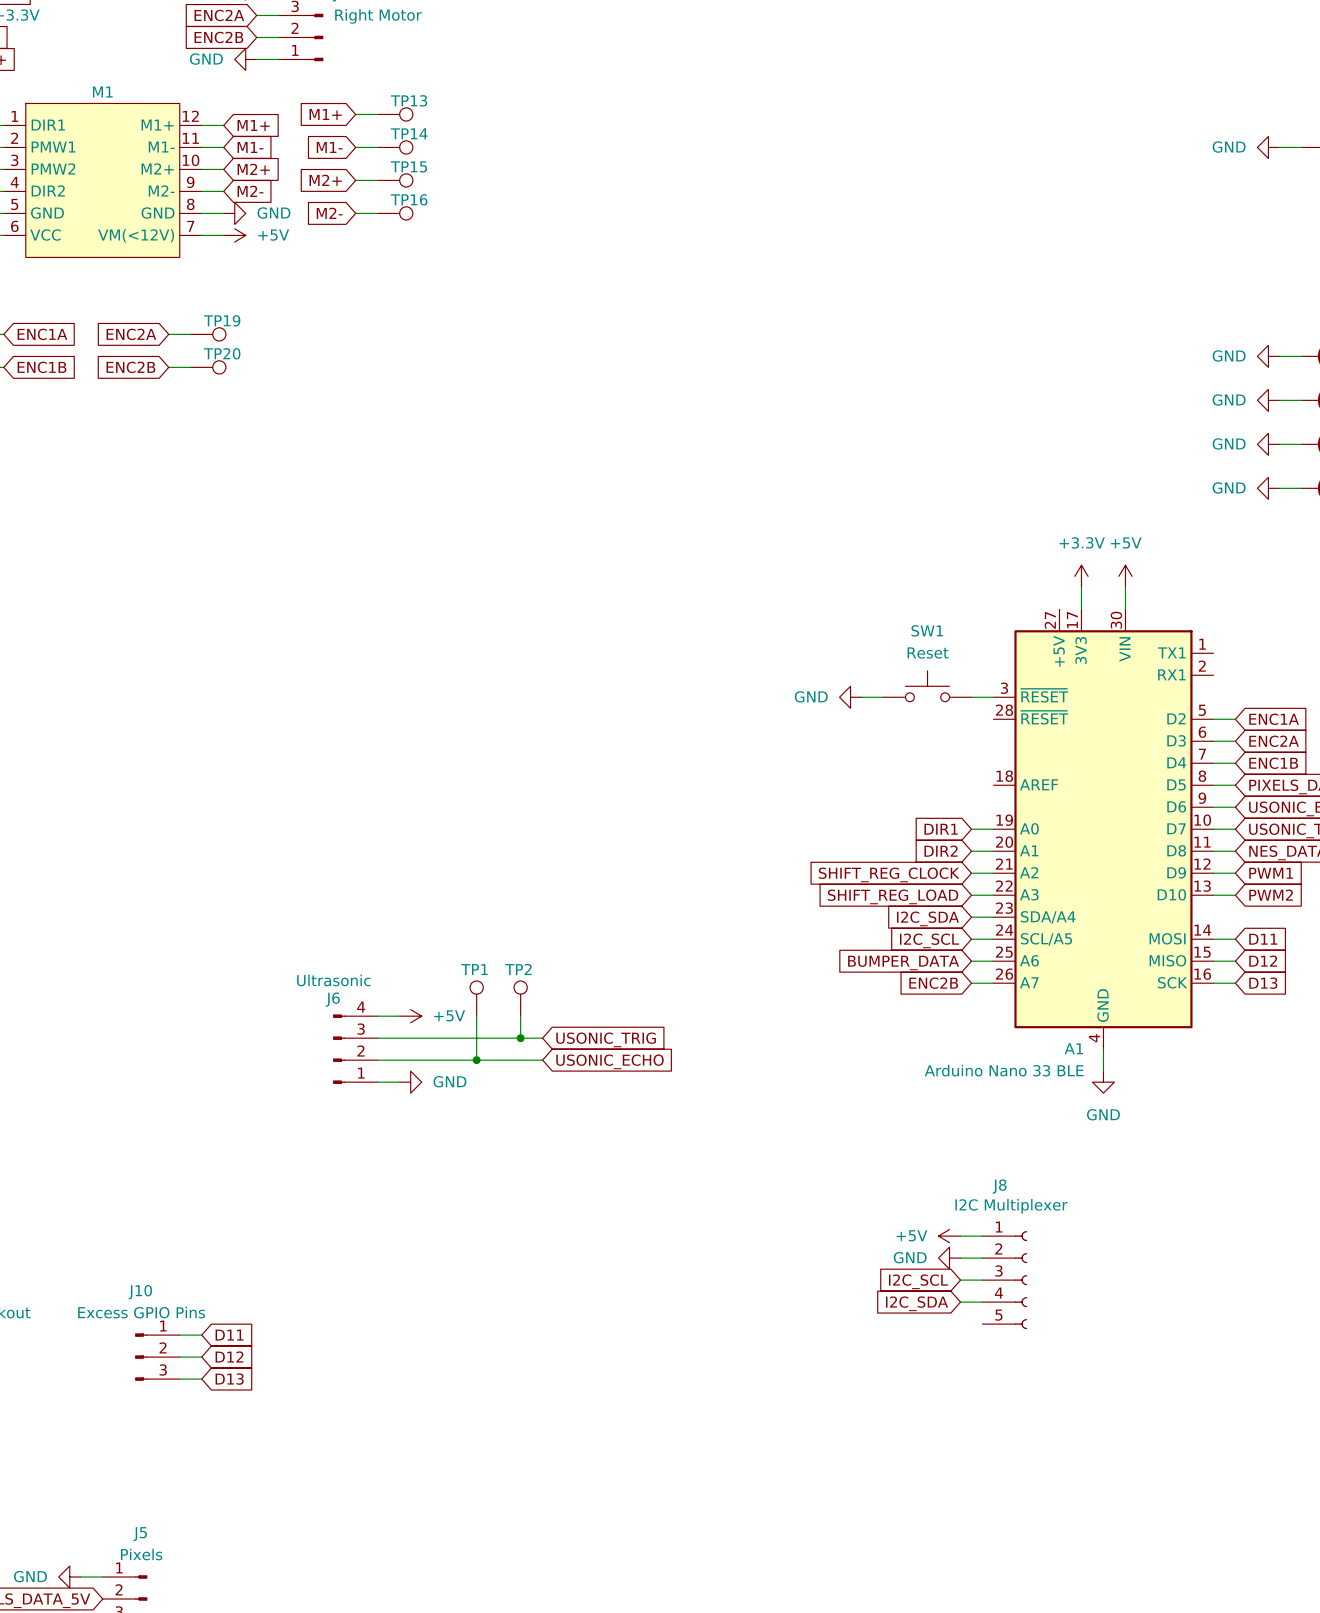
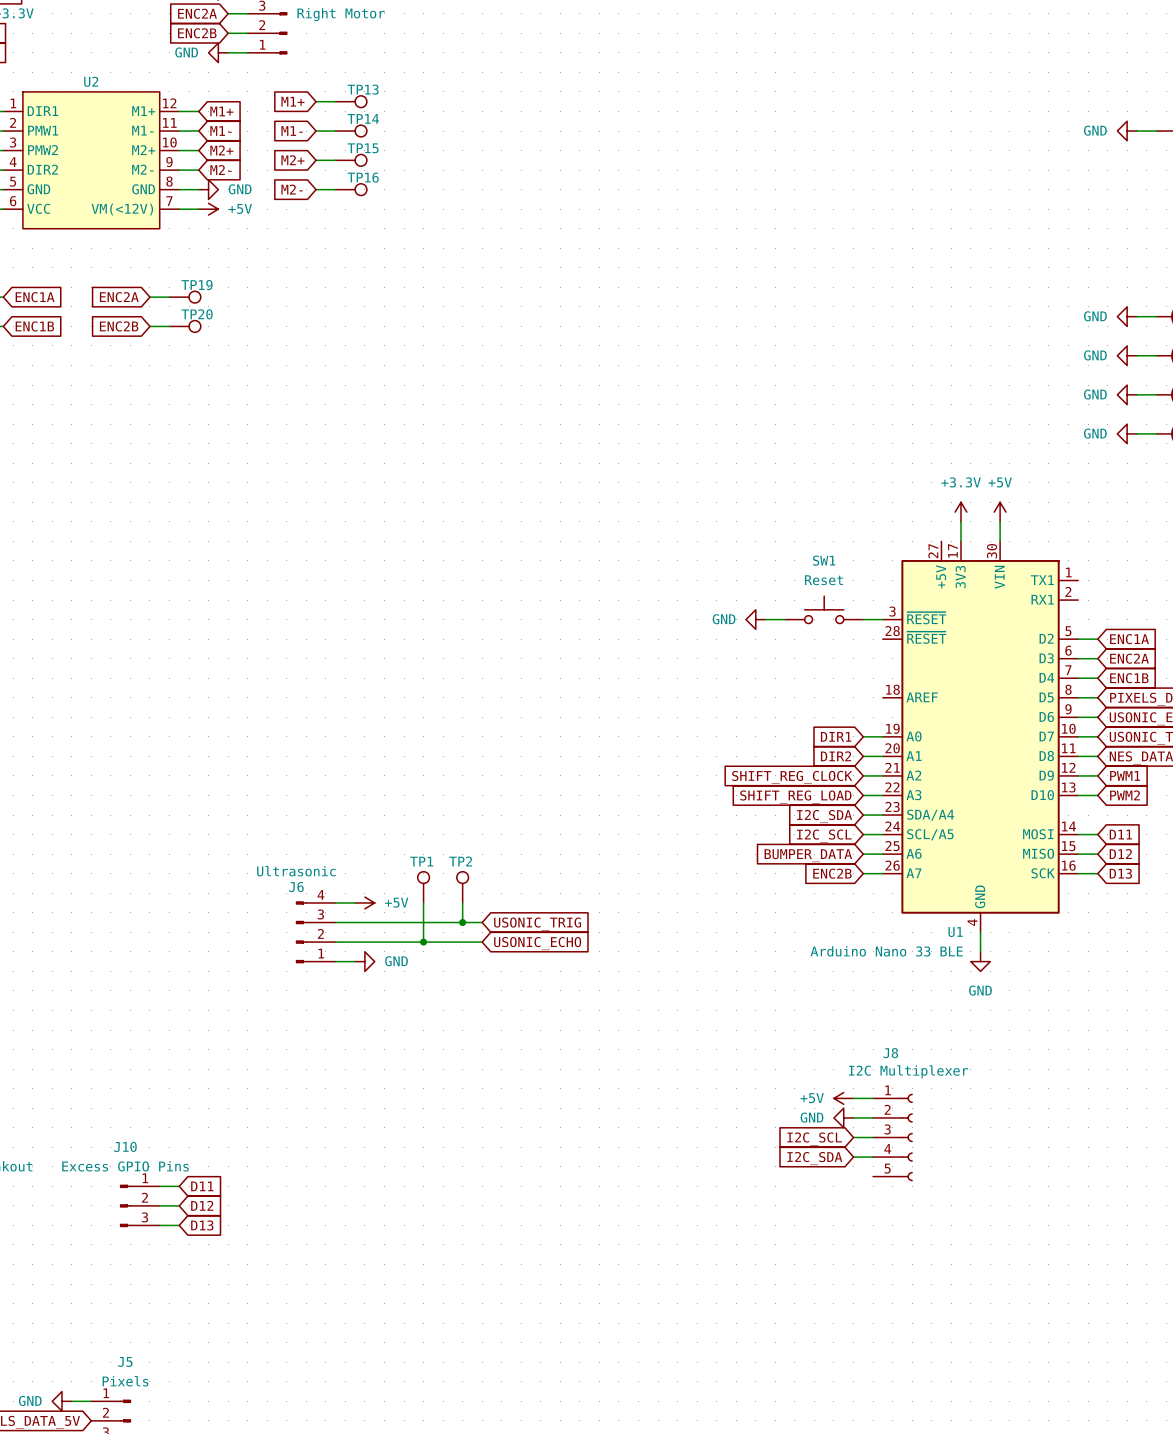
M1 name: M1 (102, 92) -> U2 (91, 81)
A1 name: A1 (1073, 1048) -> U1 (955, 932)

